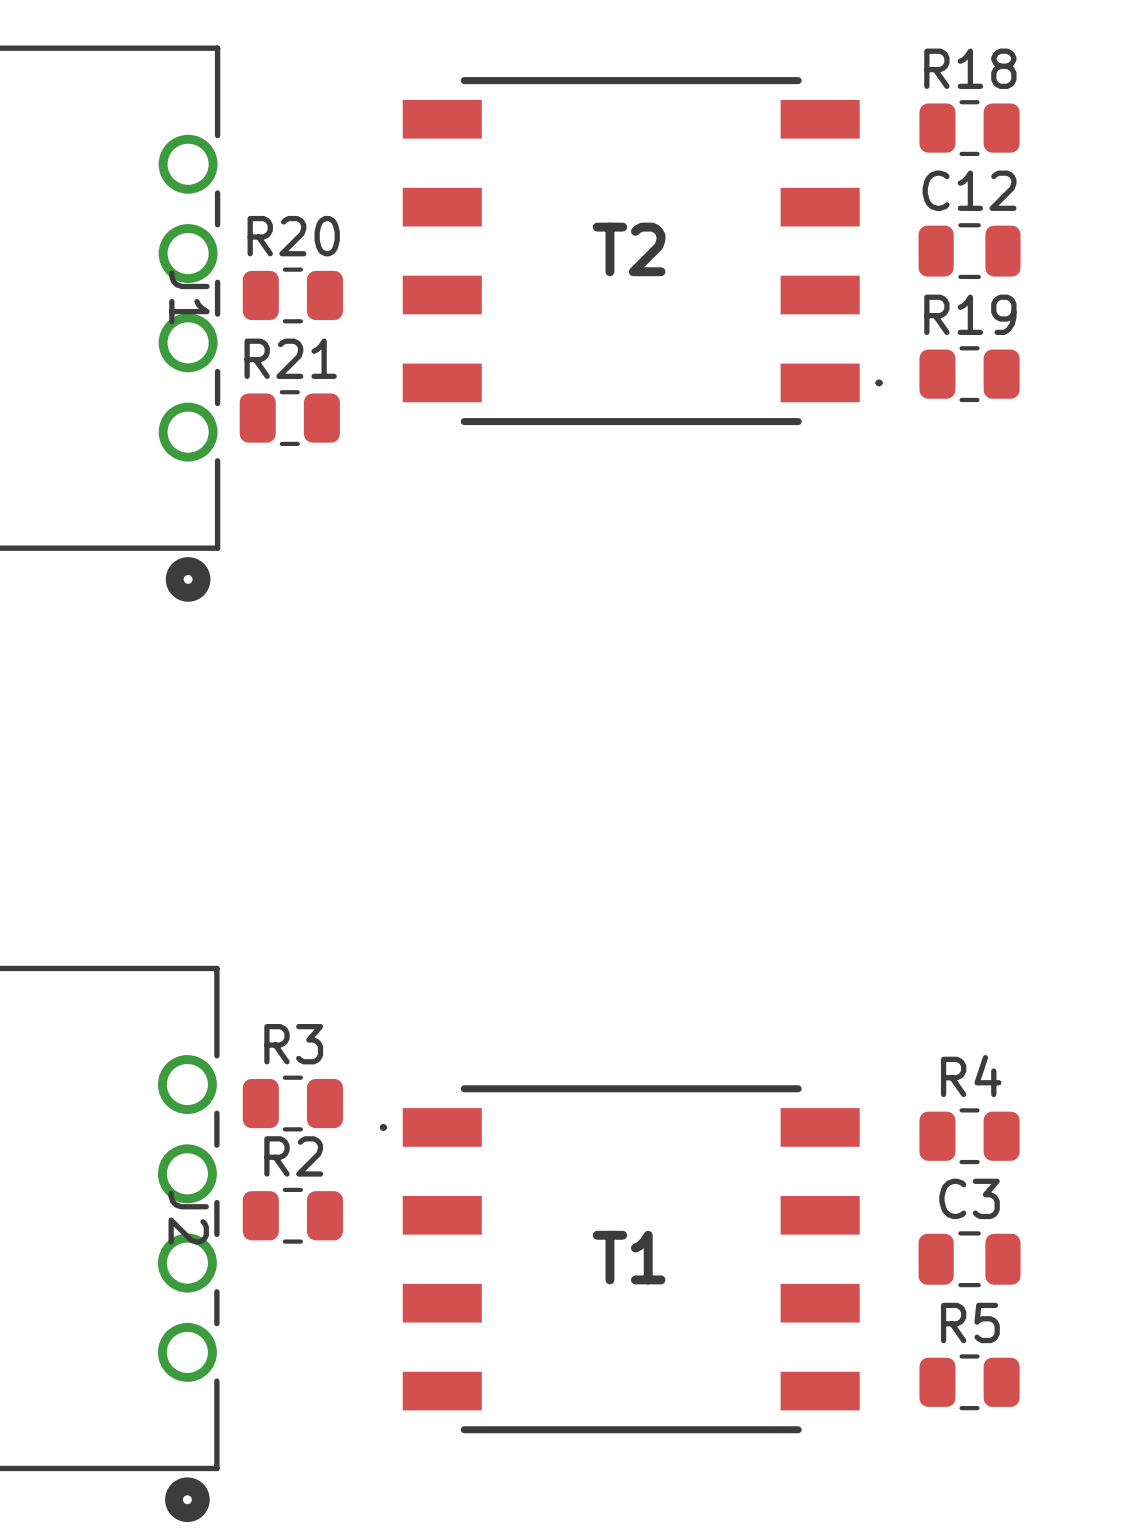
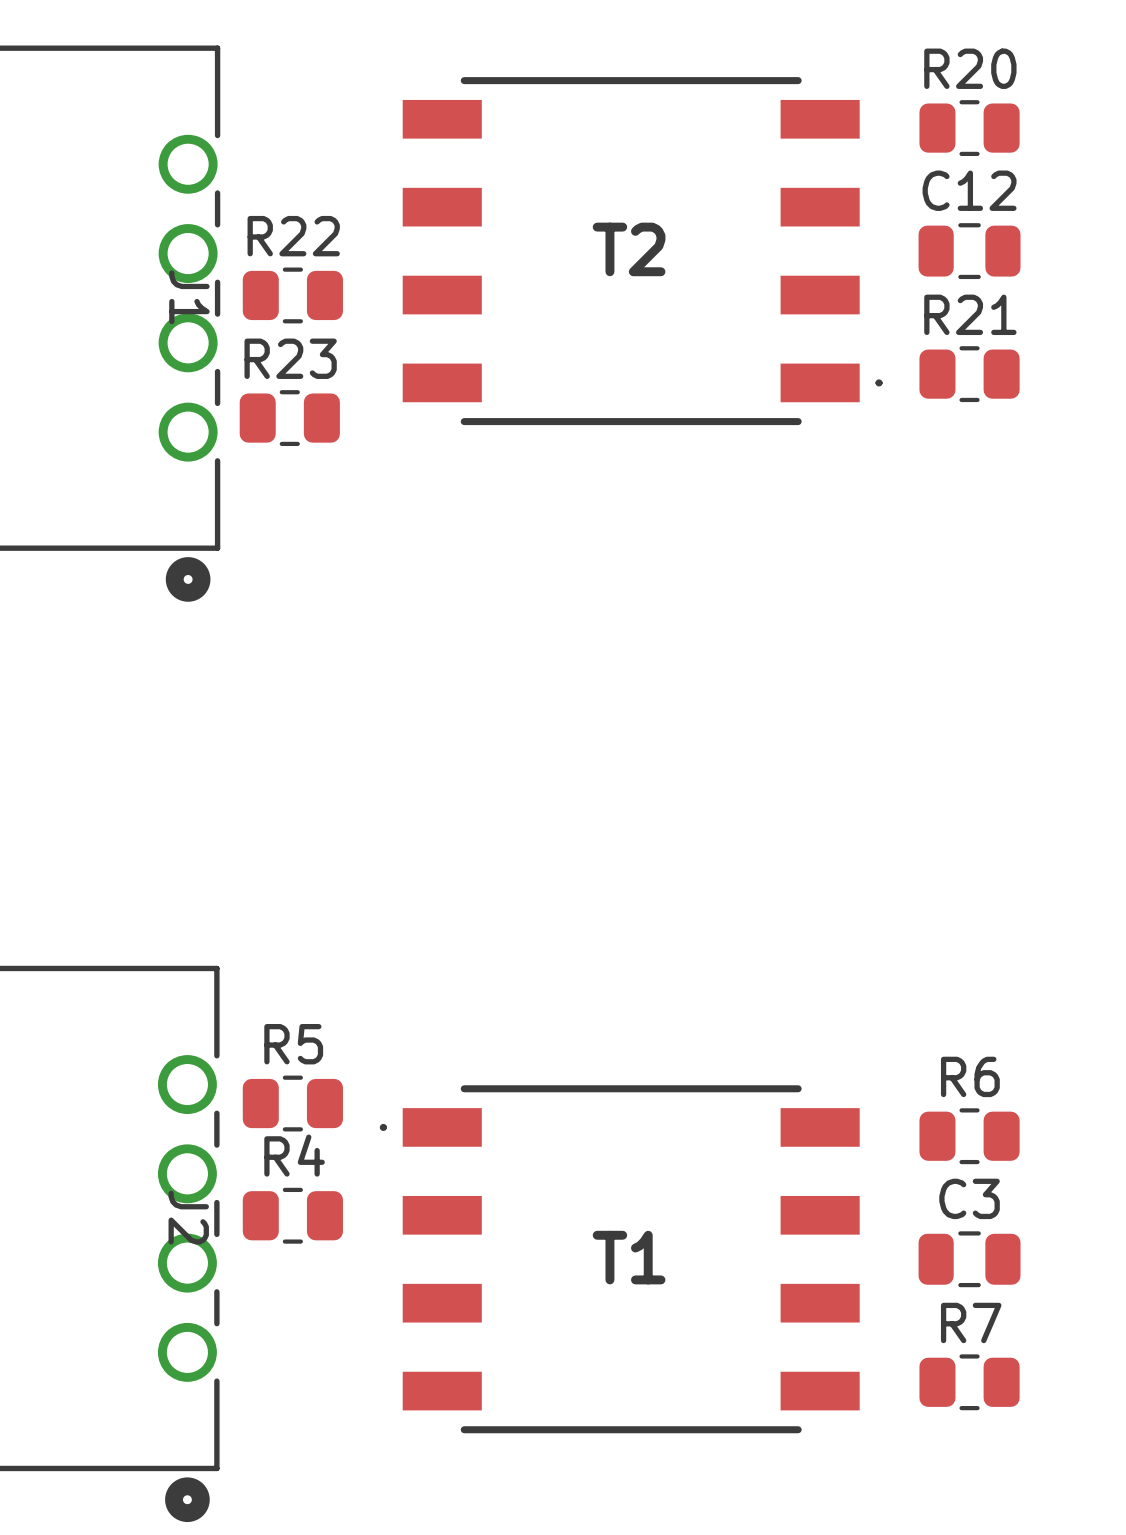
R18 name: R18 (970, 68) -> R20 (970, 68)
R20 name: R20 (293, 236) -> R22 (293, 236)
R19 name: R19 (970, 314) -> R21 (970, 314)
R21 name: R21 (290, 358) -> R23 (290, 358)
R3 name: R3 (293, 1044) -> R5 (293, 1044)
R4 name: R4 (971, 1076) -> R6 (970, 1076)
R2 name: R2 (293, 1156) -> R4 (294, 1155)
R5 name: R5 (970, 1322) -> R7 (971, 1322)

